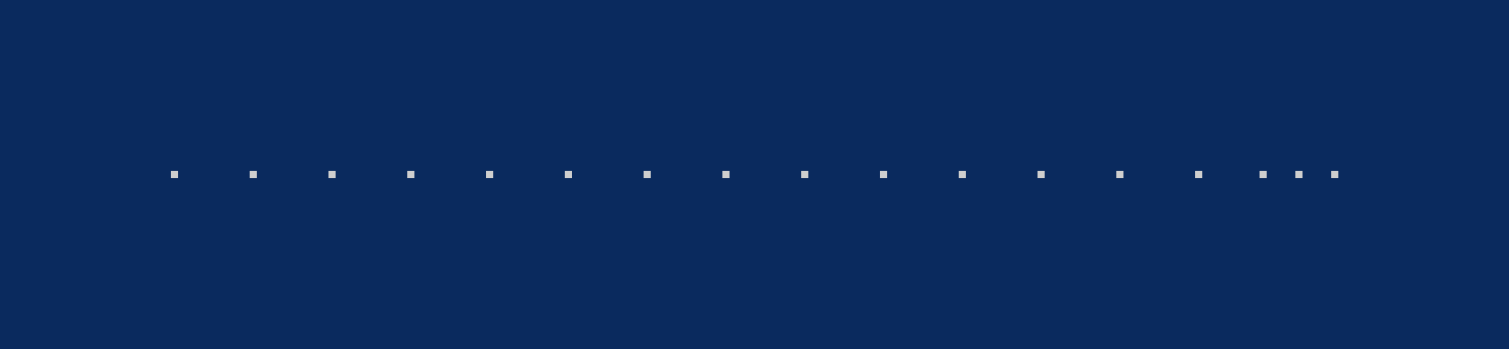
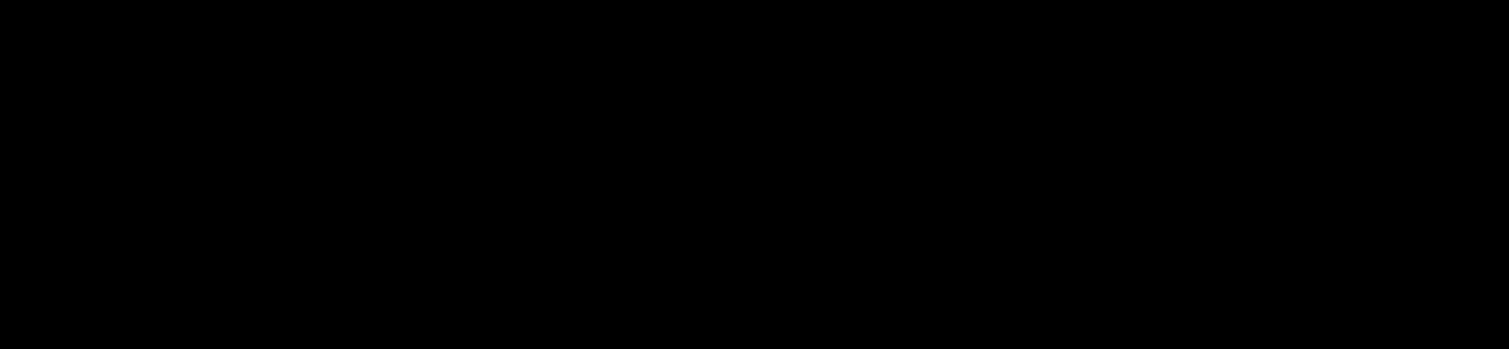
part: (754, 174) -> none

